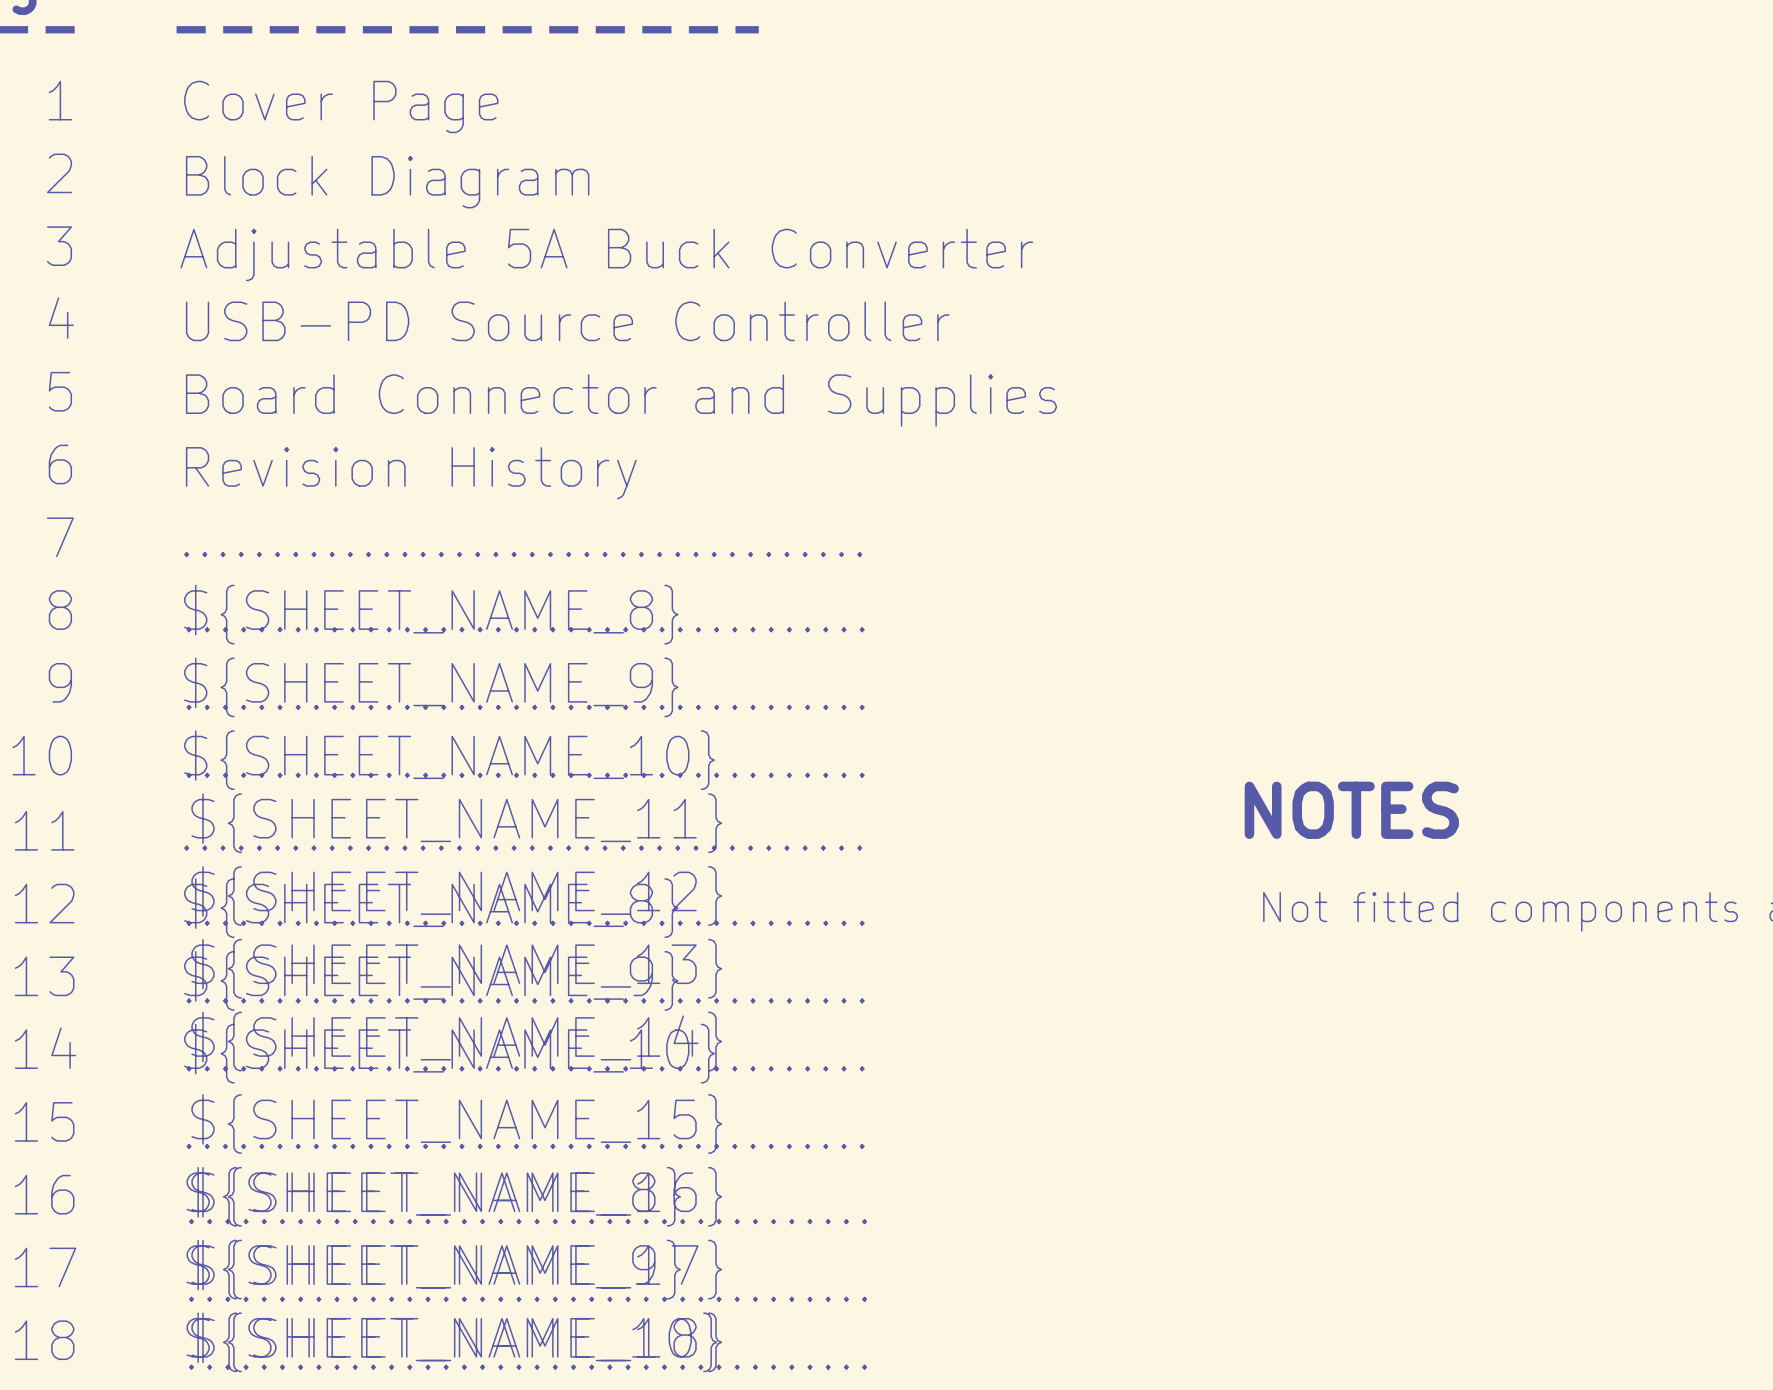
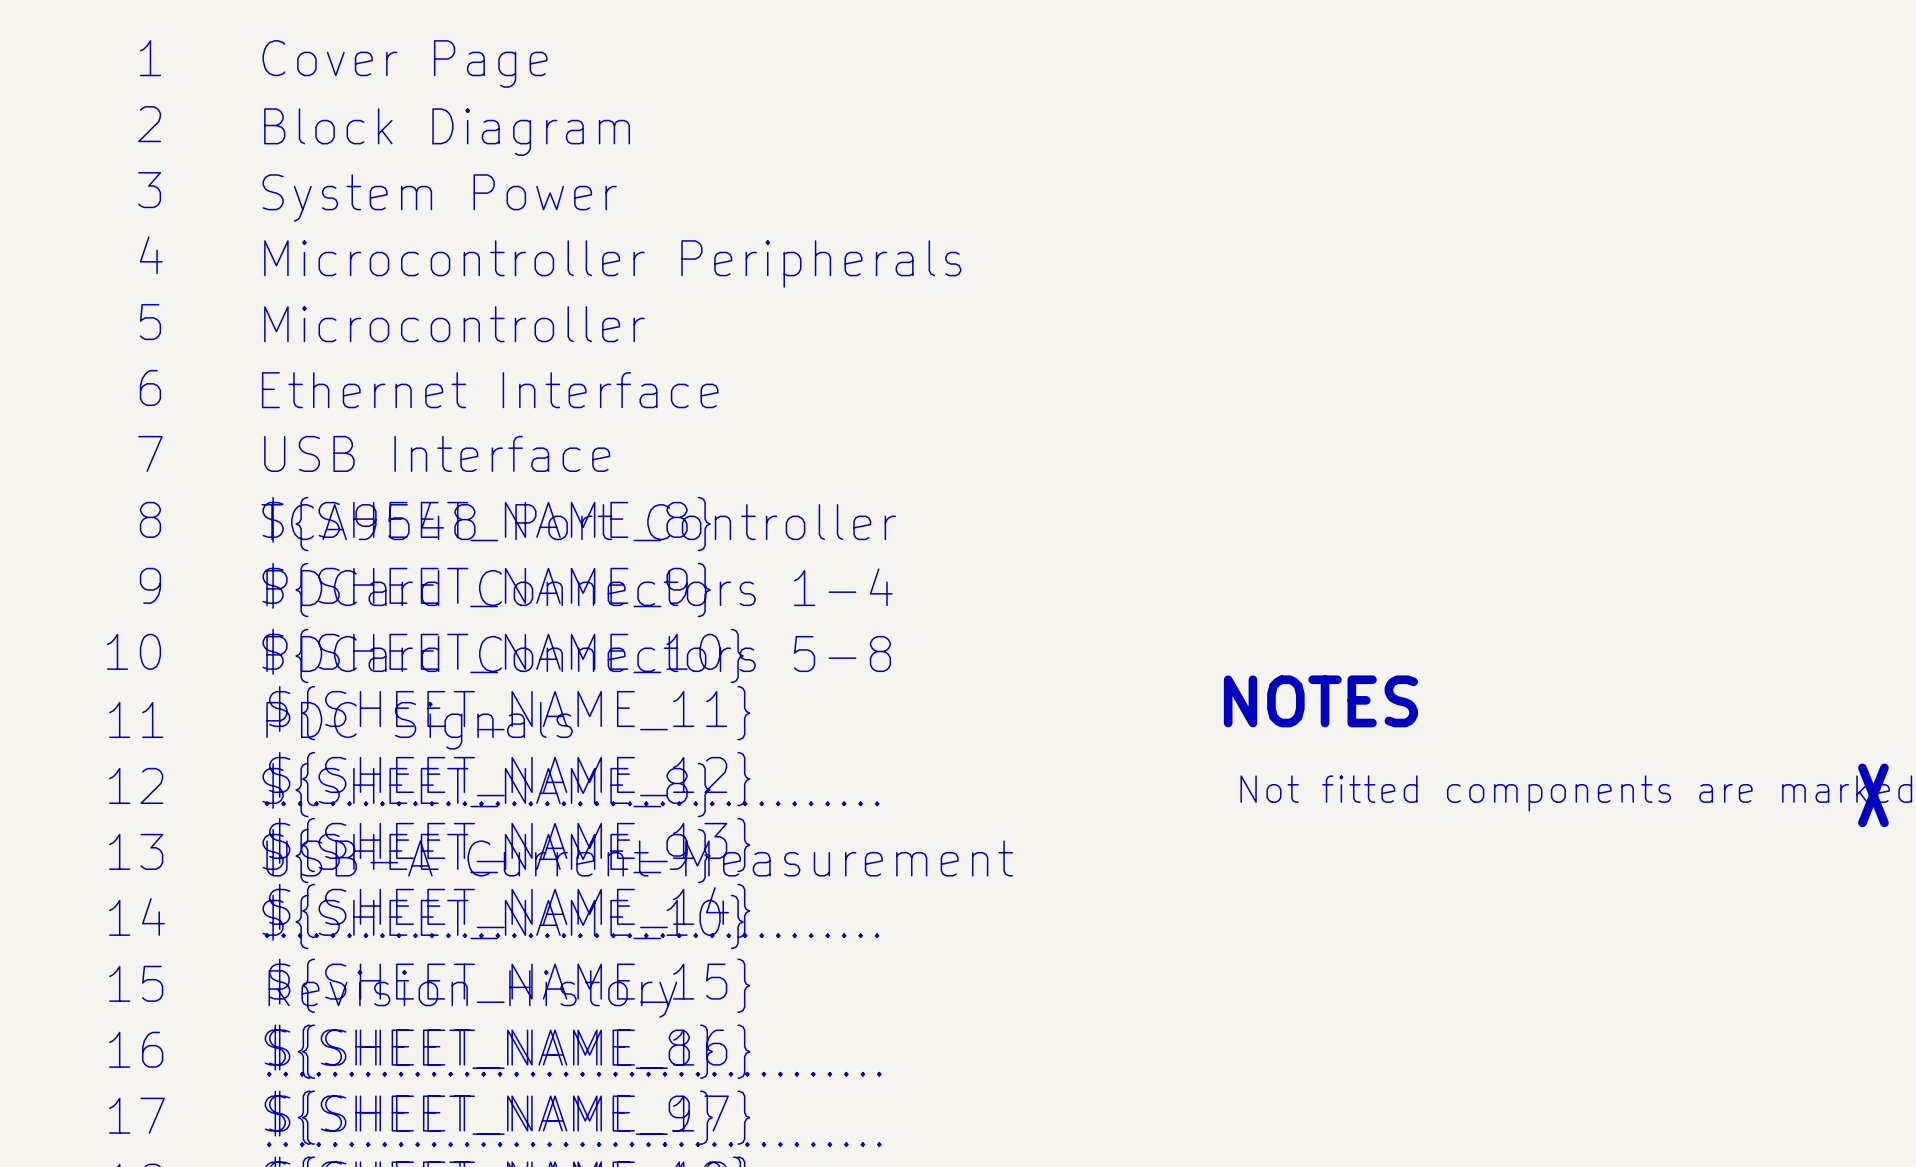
text: Adjustable 5A Buck Converter (606, 254) -> System Power (439, 198)
text: USB-PD Source Controller (567, 321) -> Microcontroller Peripherals (612, 264)
text: Board Connector and Supplies (621, 400) -> Microcontroller (454, 324)
text: Revision History (411, 473) -> Ethernet Interface (490, 390)
text: ...................................... (523, 554) -> USB Interface (437, 453)
text: ...................................... (525, 629) -> TCA9548 Port Controller (578, 521)
text: ...................................... (525, 707) -> PDCard Connectors 1-4 (579, 587)
text: ...................................... (525, 775) -> PDCard Connectors 5-8 (578, 654)
text: ...................................... (523, 848) -> PDC Signals (419, 725)
text: ...................................... (525, 1000) -> USB-A Current Measurement (639, 858)
text: ...................................... (525, 1146) -> Revision History (472, 993)

